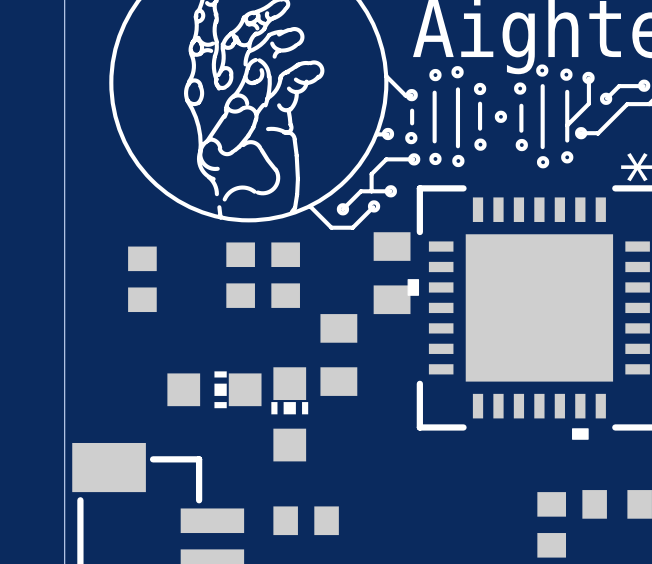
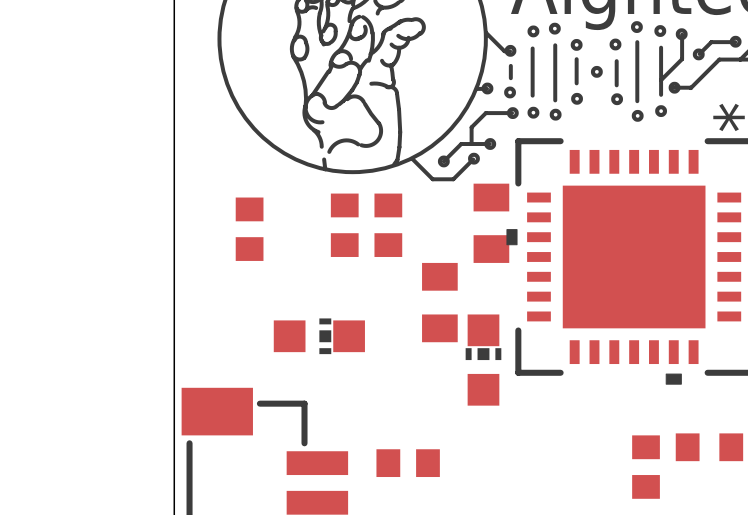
part position: (289, 414) -> (483, 360)

